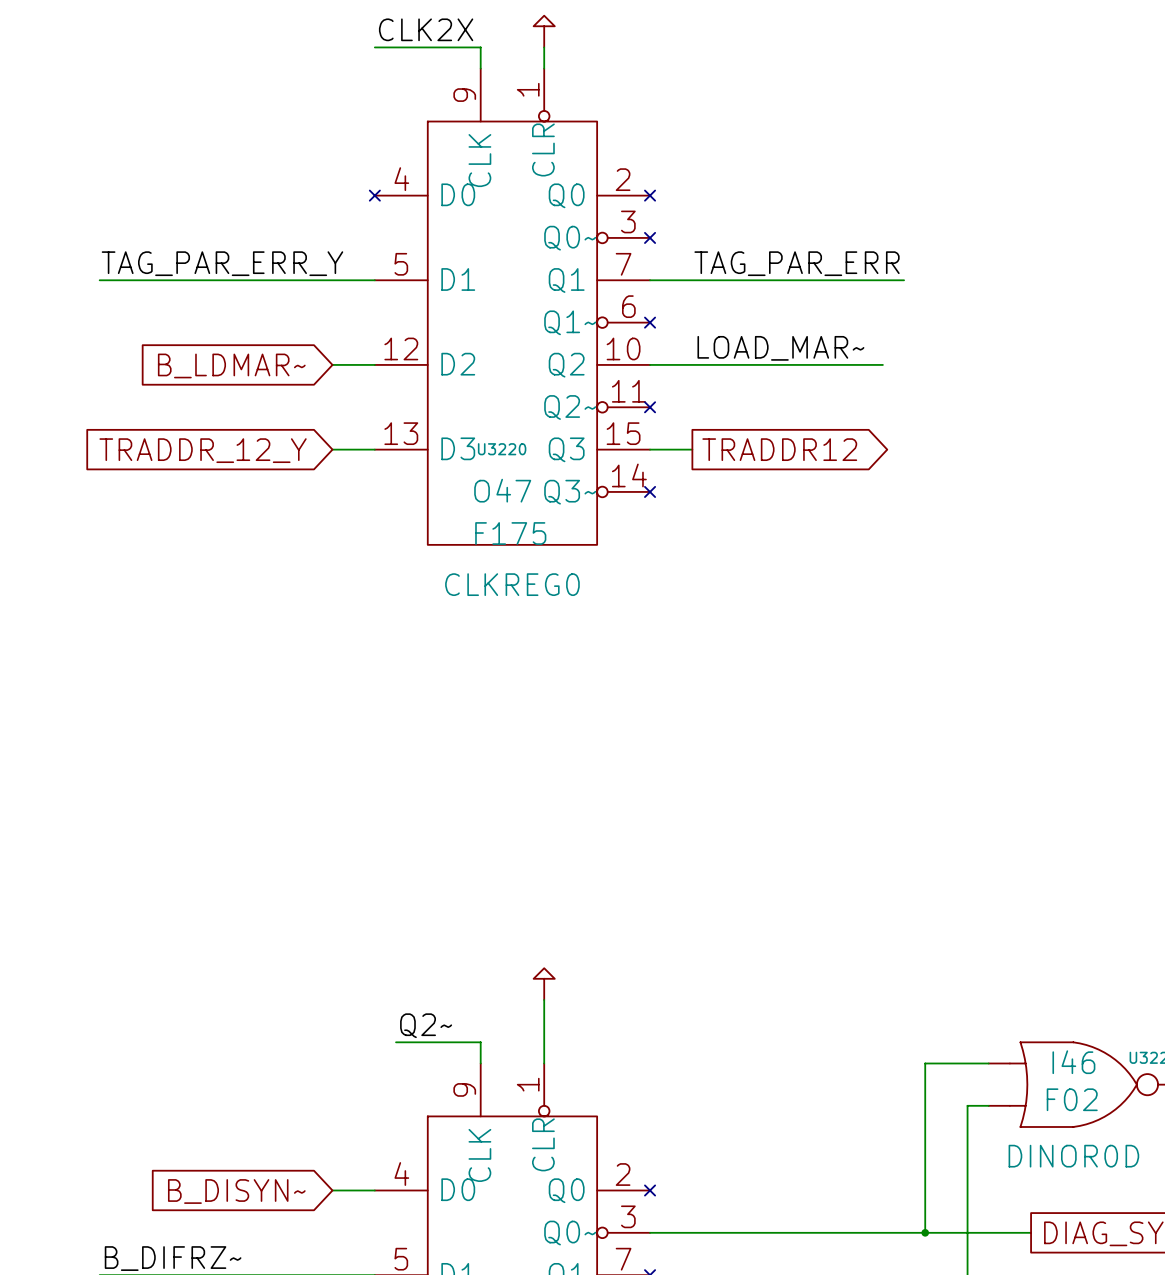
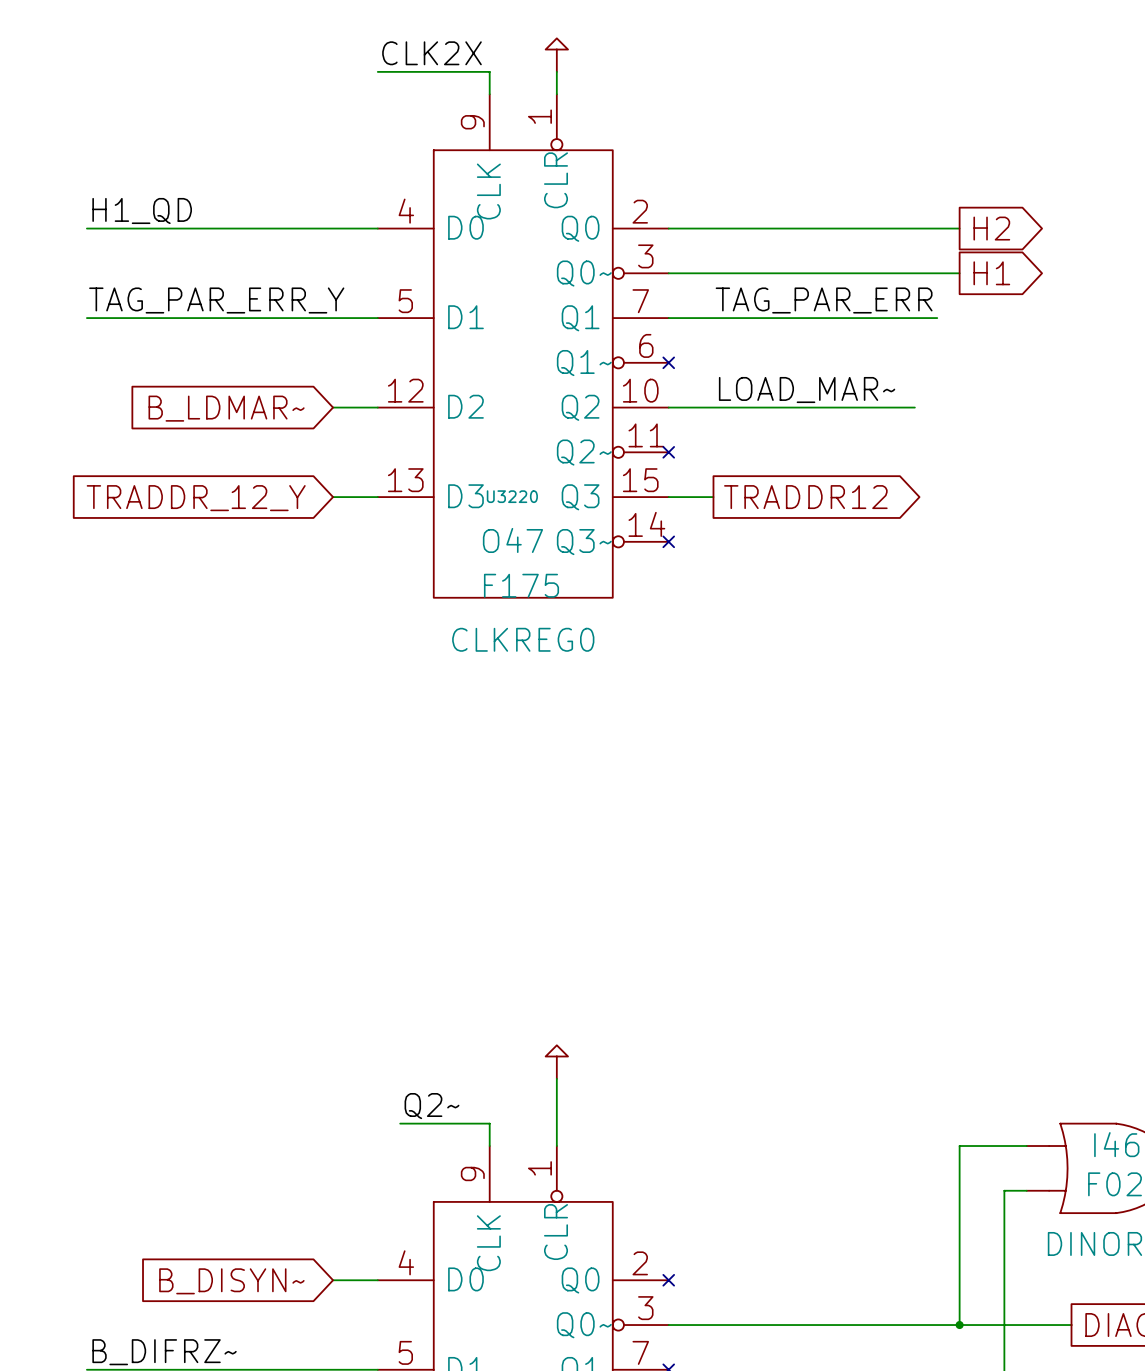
label: none -> H1_QD (142, 210)
wire: none -> (86, 228) (377, 228)
no-connect mark: (374, 195) -> none
wire: none -> (668, 228) (959, 228)
no-connect mark: (650, 195) -> none
global label: none -> H2 (991, 228)
wire: none -> (668, 273) (959, 273)
no-connect mark: (650, 237) -> none
global label: none -> H1 (991, 273)

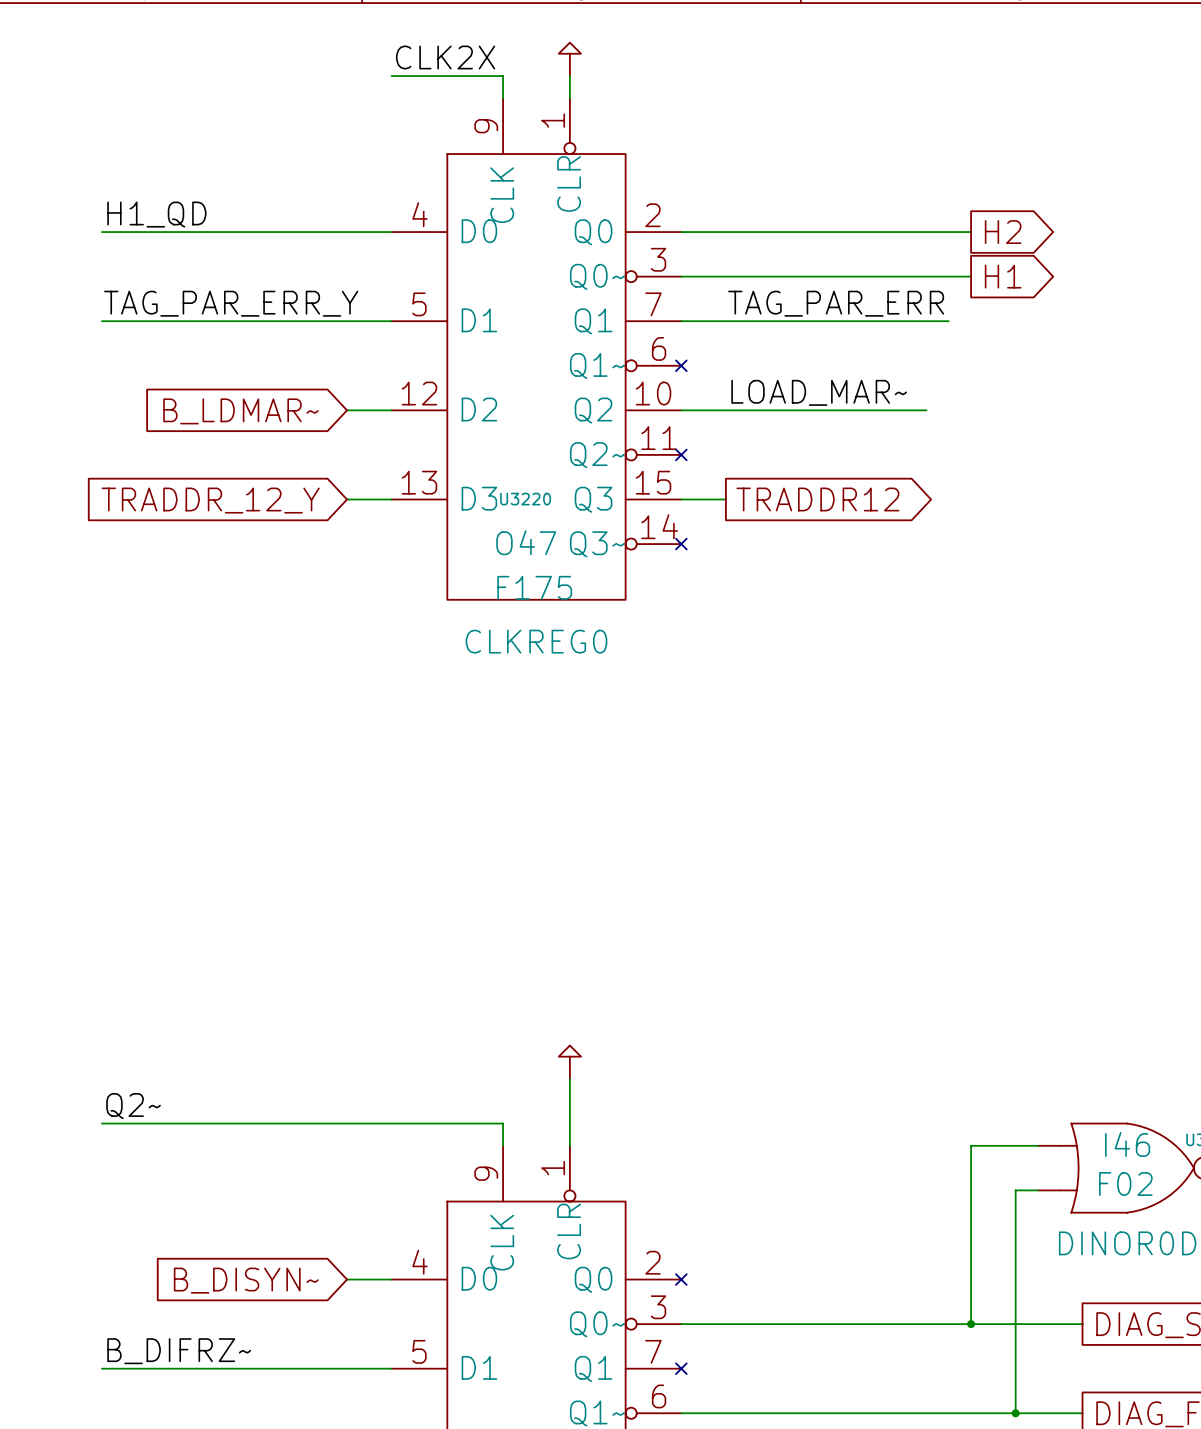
label: none -> Q2~ (133, 1106)
label: Q2~ (431, 1106) -> none
wire: none -> (101, 1123) (413, 1123)

